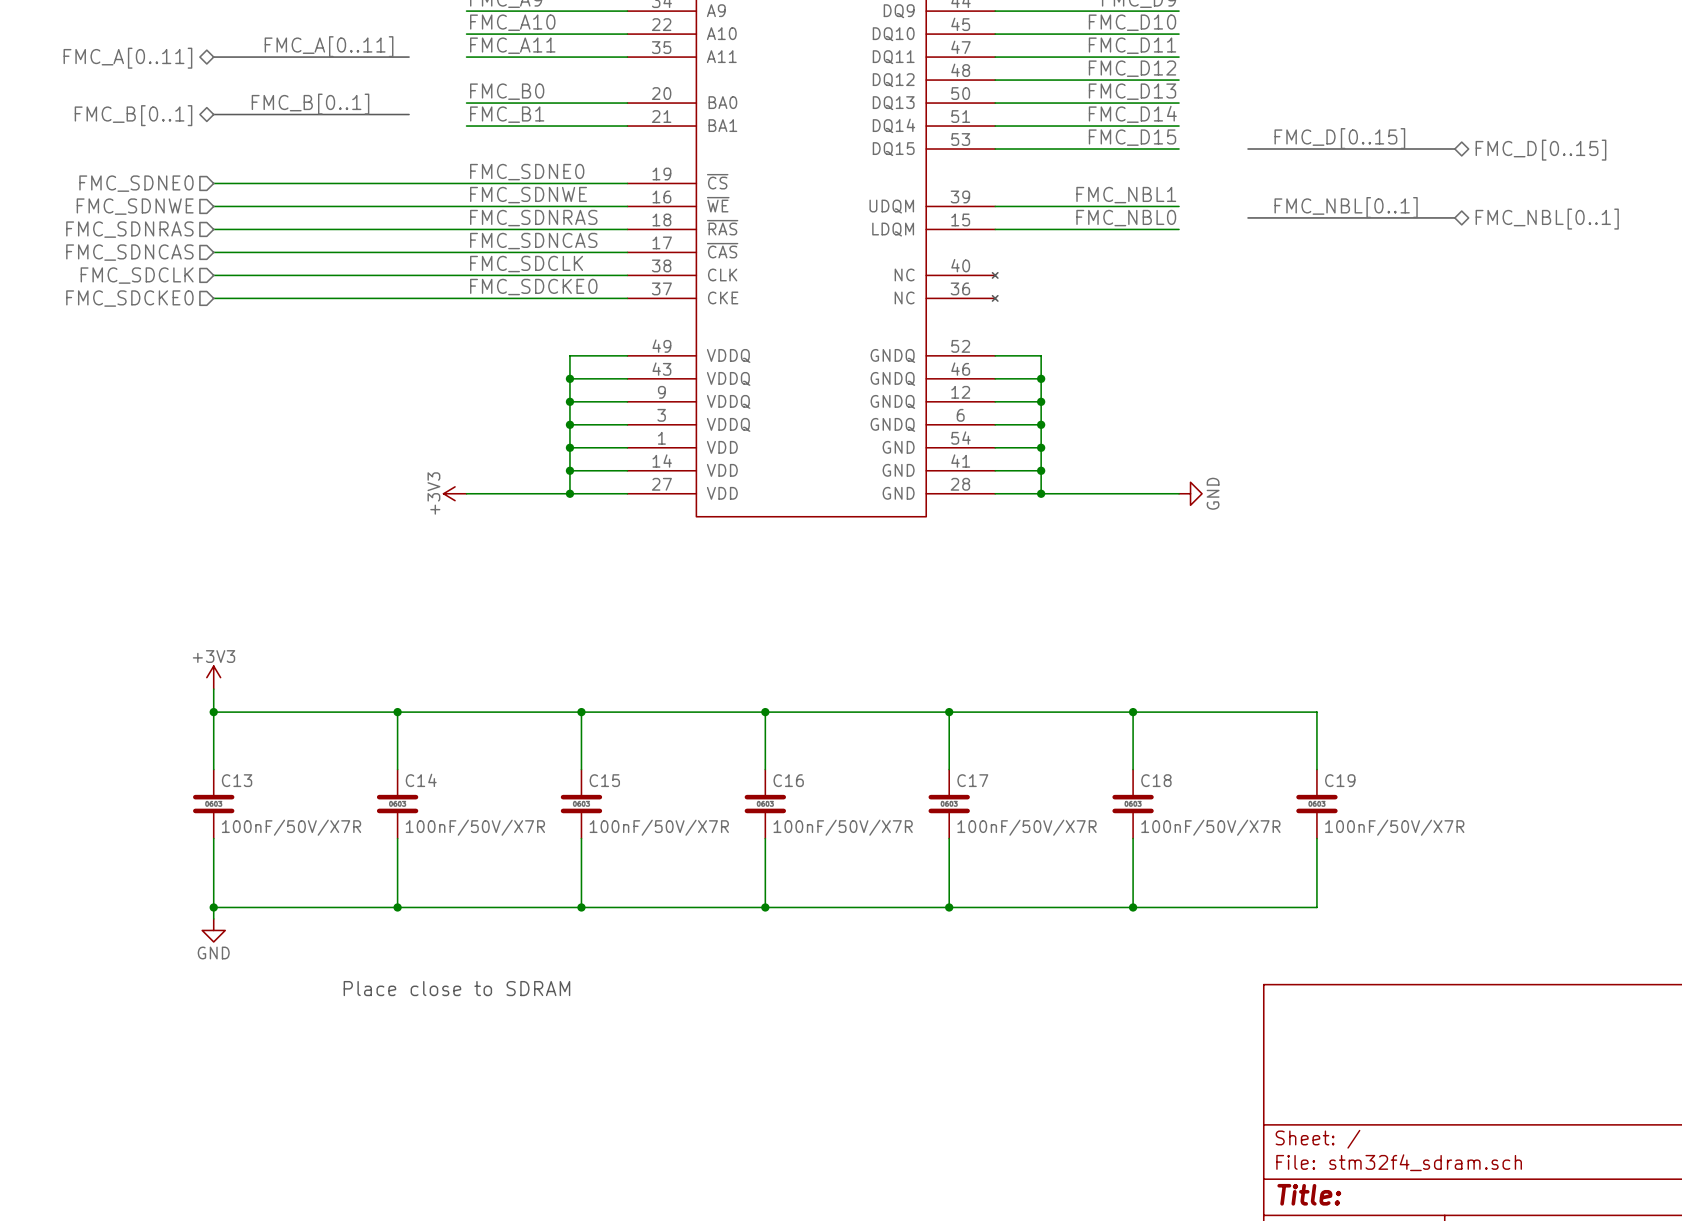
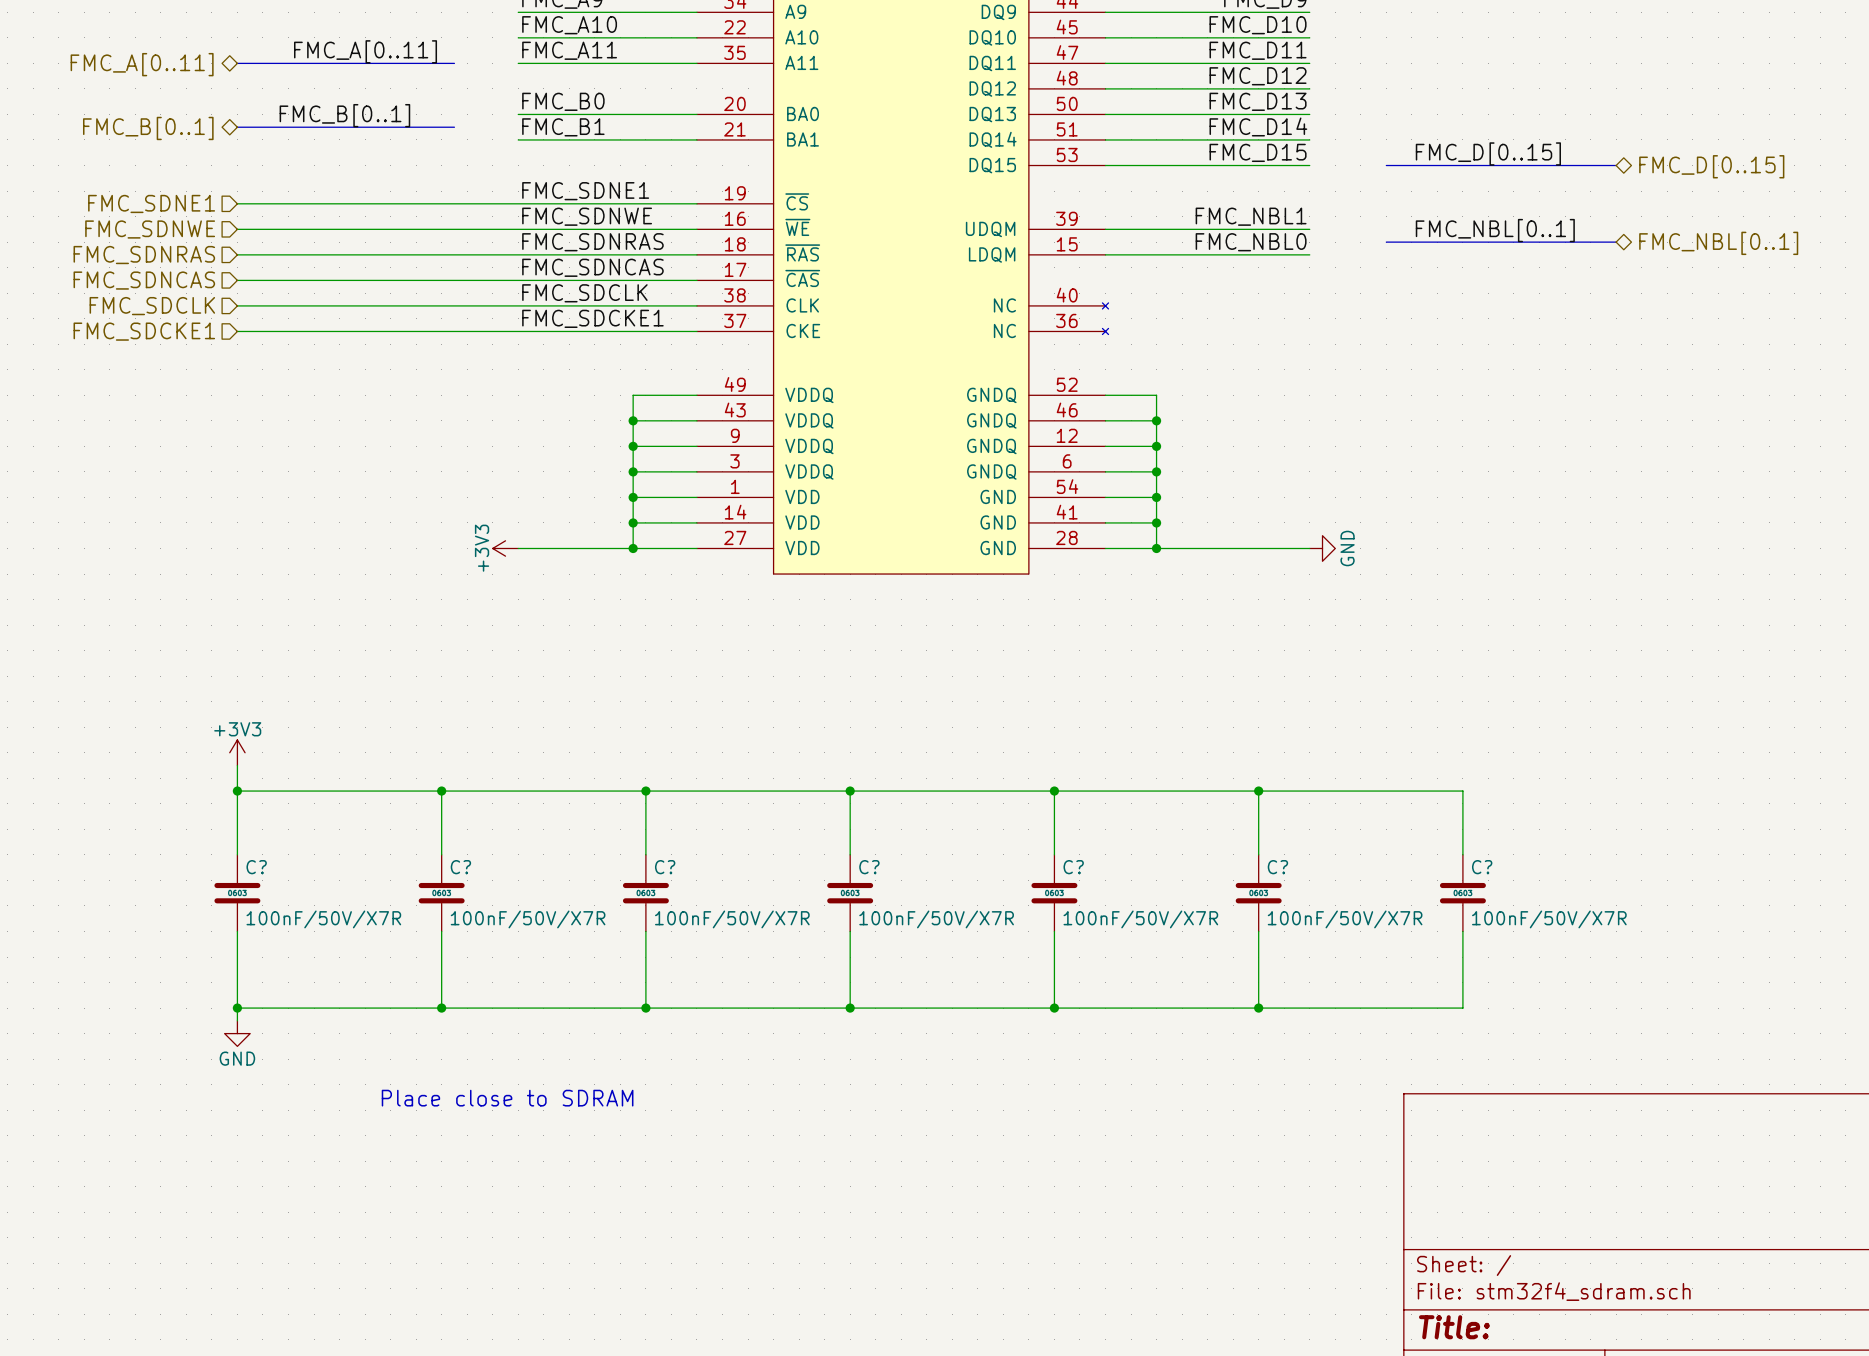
label: FMC_SDNE0 (527, 172) -> FMC_SDNE1 (585, 191)
hierarchical label: FMC_SDNE0 (136, 183) -> FMC_SDNE1 (151, 203)
label: FMC_SDCKE0 (533, 287) -> FMC_SDCKE1 (592, 318)
hierarchical label: FMC_SDCKE0 (129, 298) -> FMC_SDCKE1 (144, 331)
C13 name: C13 (237, 780) -> C? (256, 867)
C14 name: C14 (421, 780) -> C? (460, 867)
C15 name: C15 (604, 780) -> C? (665, 867)
C16 name: C16 (788, 780) -> C? (869, 867)
C17 name: C17 (972, 780) -> C? (1073, 867)
C18 name: C18 (1156, 780) -> C? (1277, 867)
C19 name: C19 (1340, 780) -> C? (1482, 867)

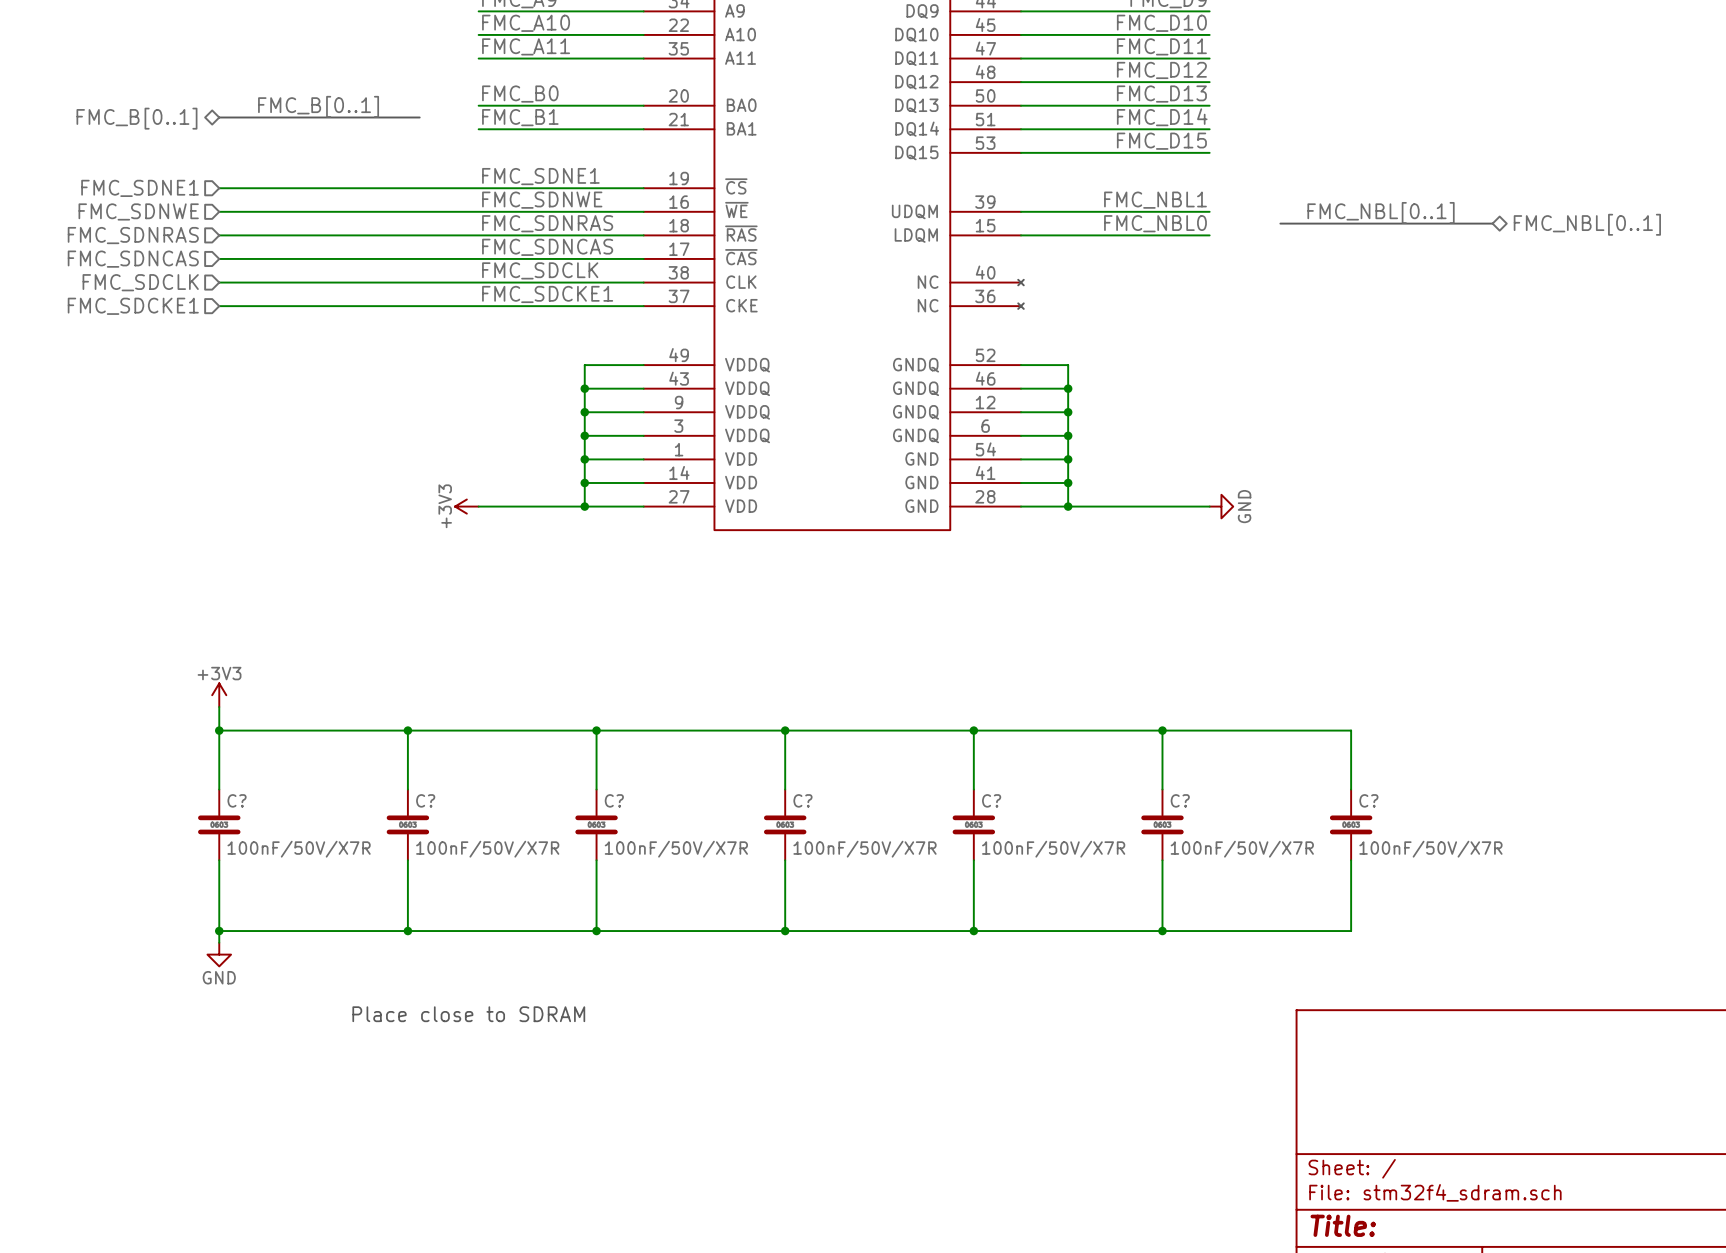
label: FMC_A[0..11] (365, 51) -> none
bus: (237, 63) (454, 63) -> none
hierarchical label: FMC_A[0..11] (142, 64) -> none
label: FMC_D[0..15] (1488, 153) -> none
bus: (1386, 165) (1616, 165) -> none
hierarchical label: FMC_D[0..15] (1711, 166) -> none

